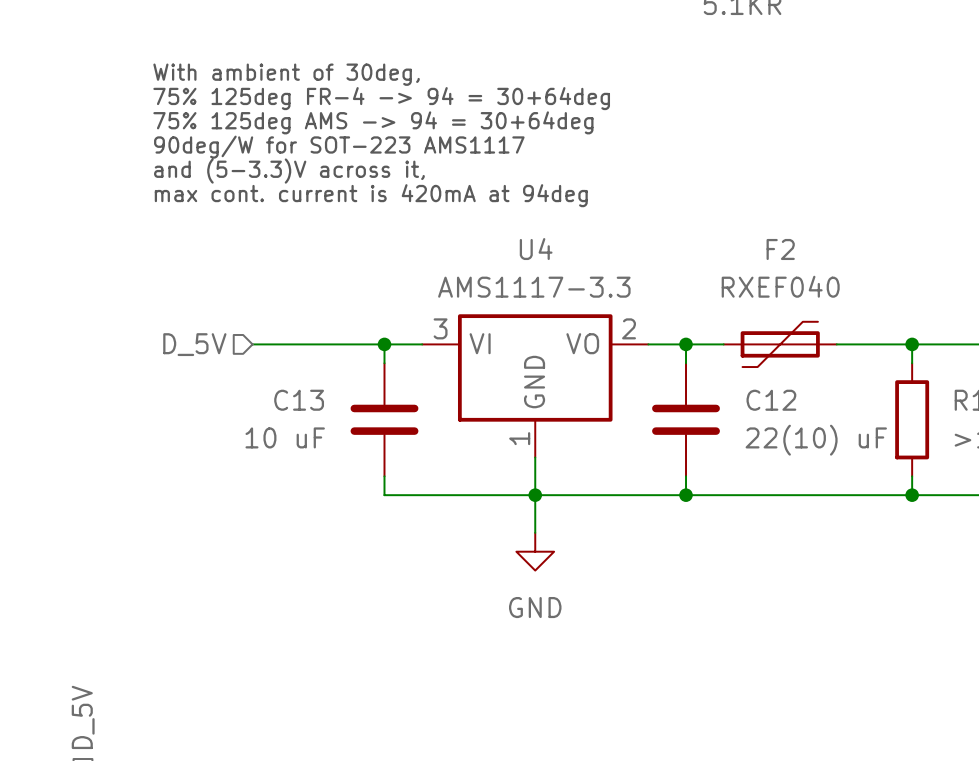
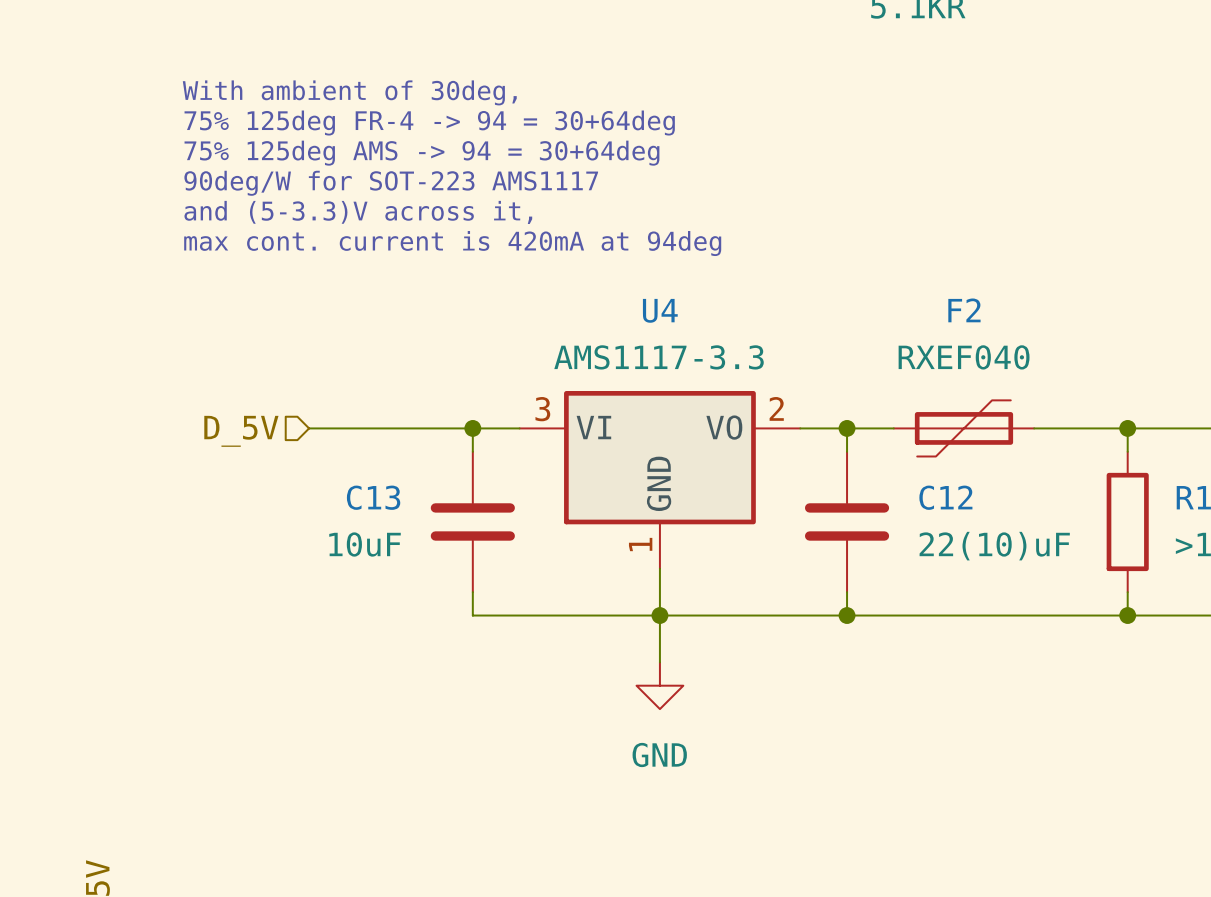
C13 value: 10 uF (285, 437) -> 10uF (365, 544)
C12 value: 22(10) uF (816, 440) -> 22(10)uF (994, 546)

